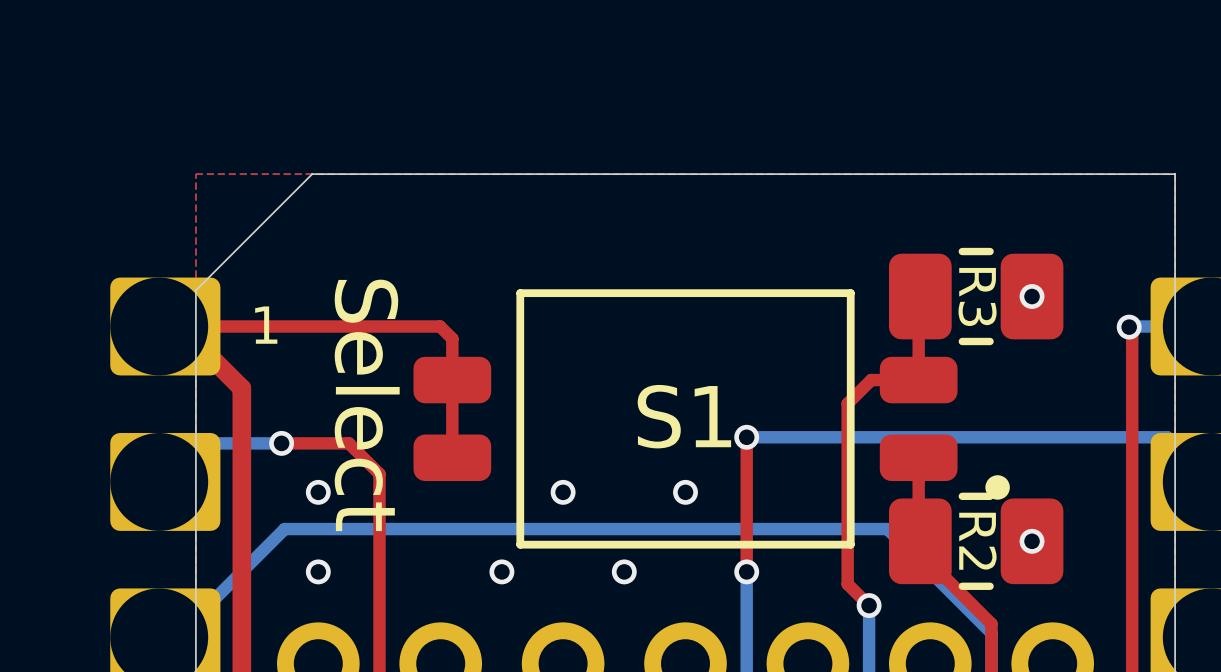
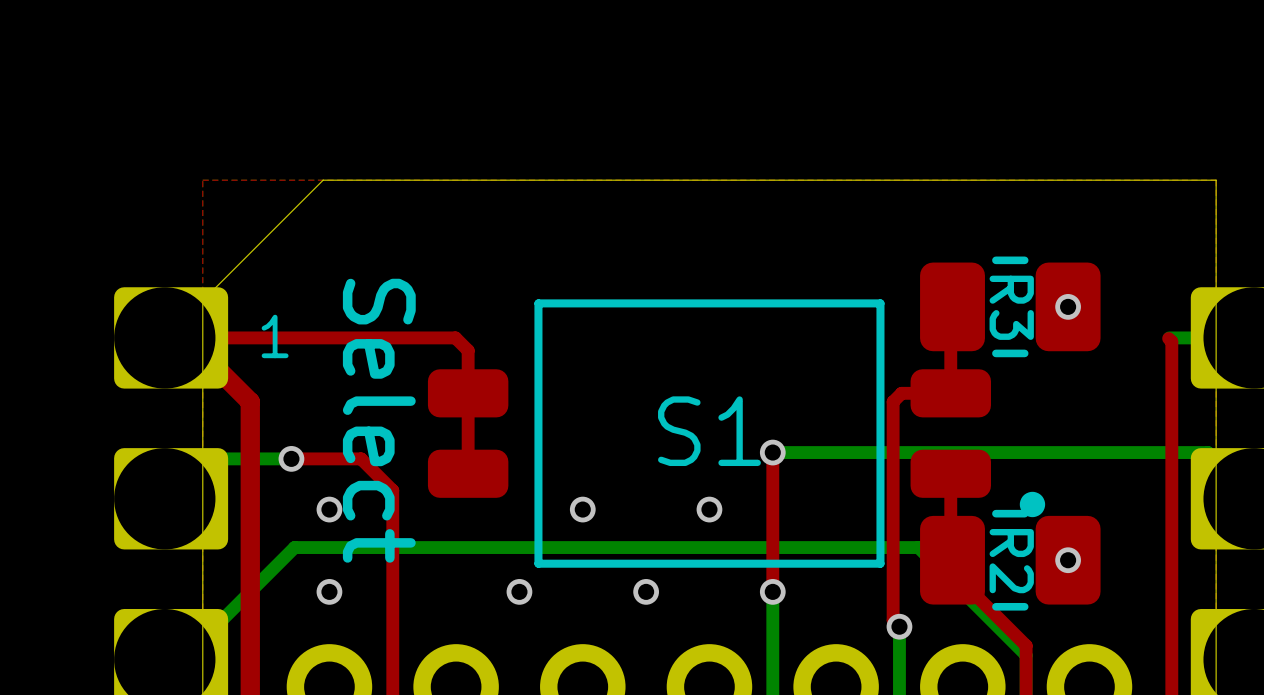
via: (1129, 327) -> none
top track: (862, 388) (847, 403) (847, 584) (862, 599) -> (893, 401) (893, 620)

